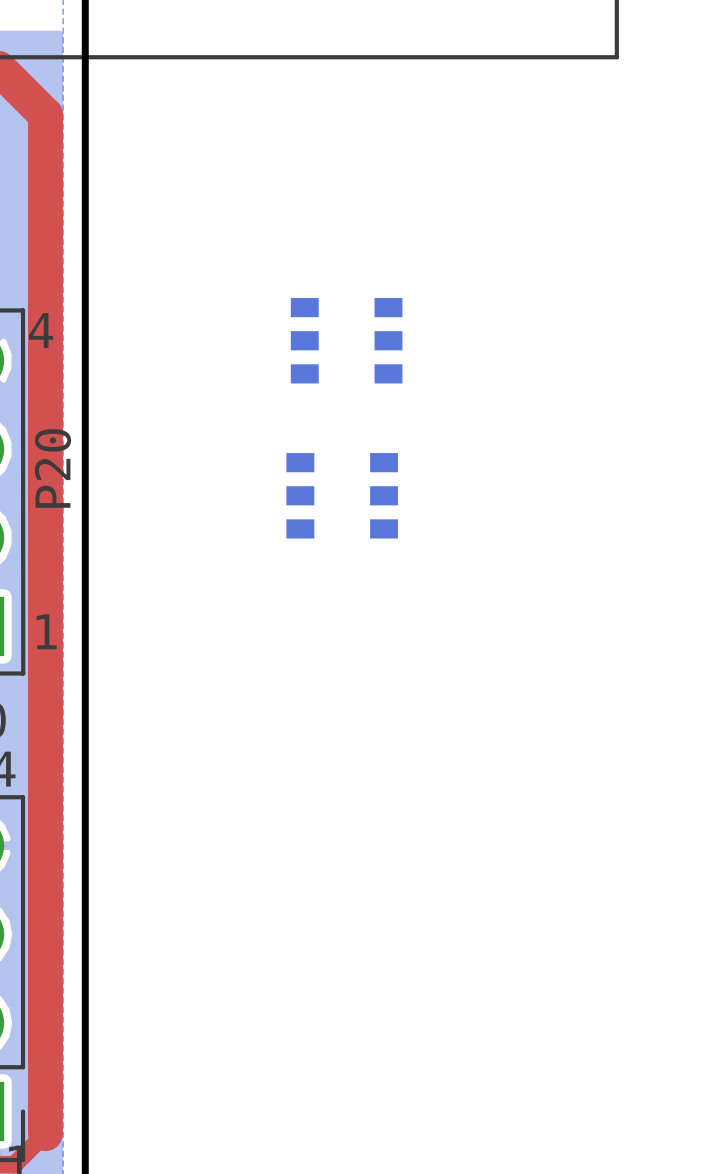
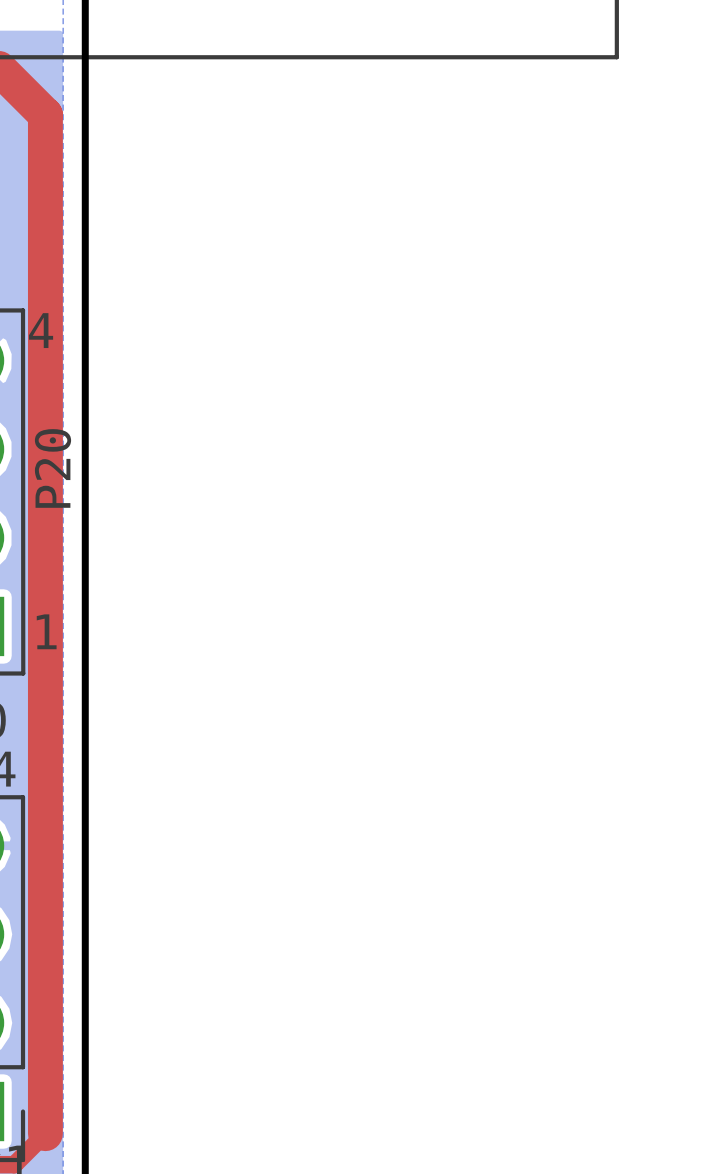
part: (346, 340) -> none
part: (342, 495) -> none

